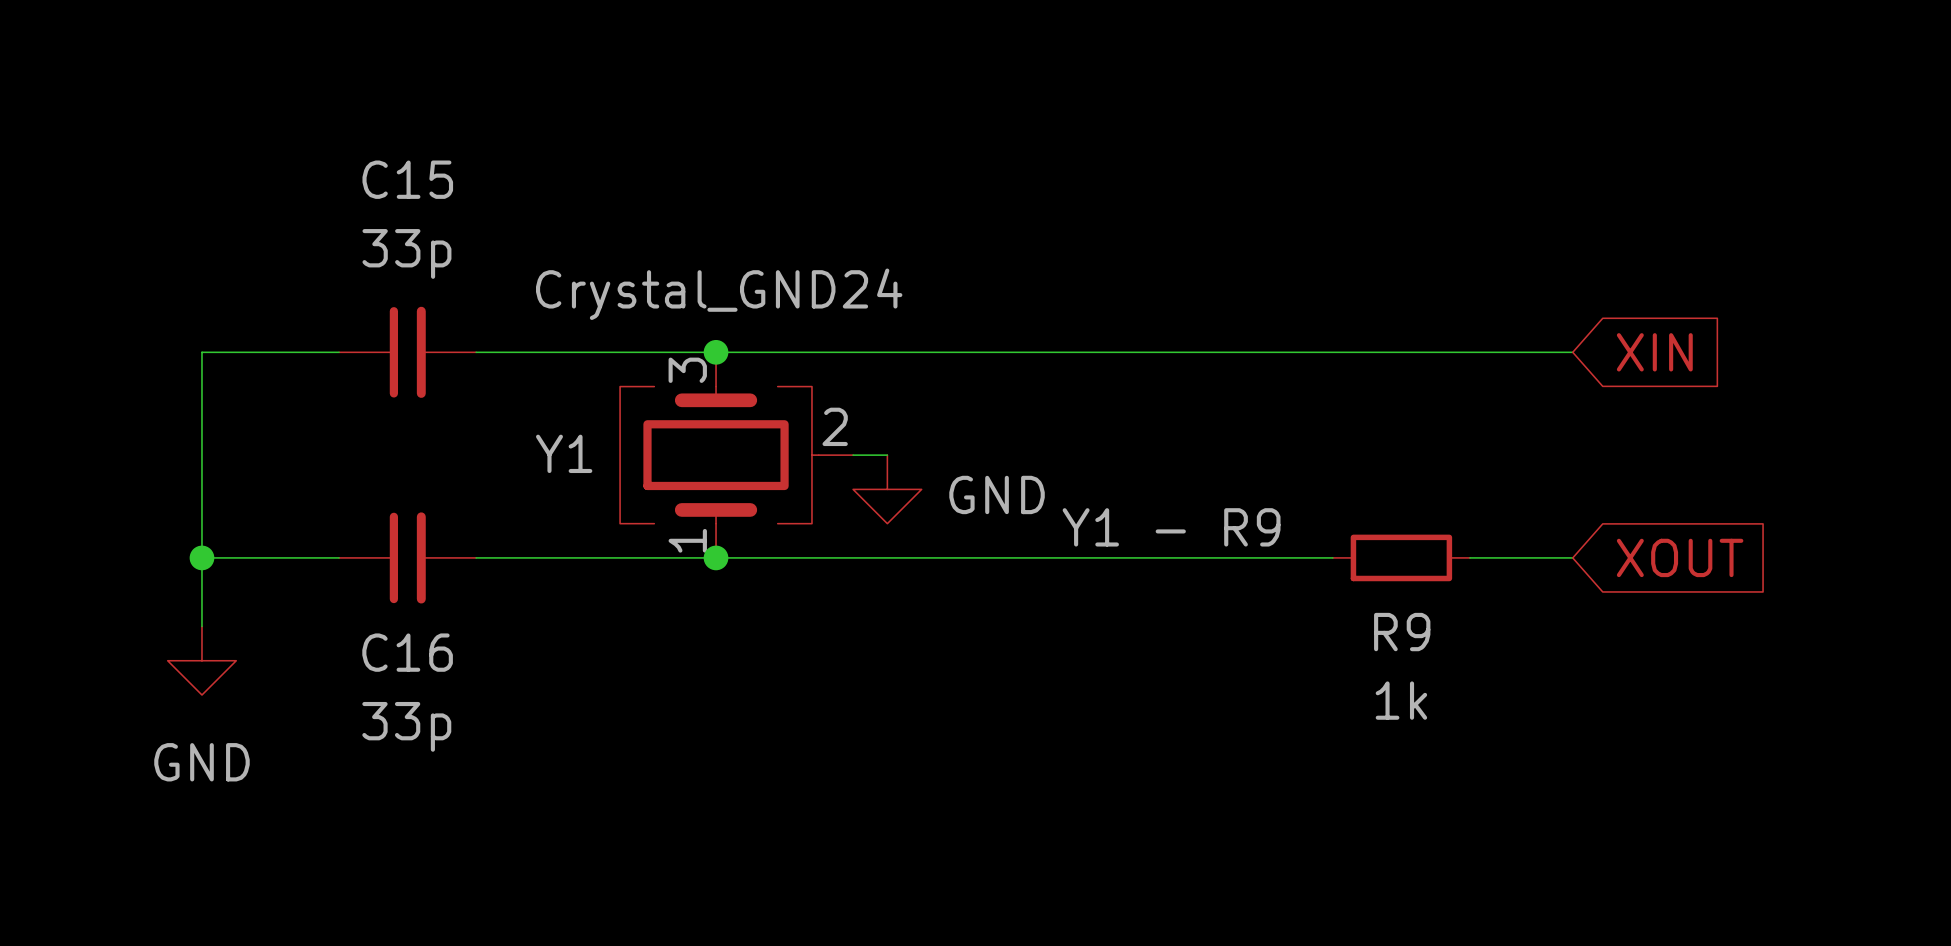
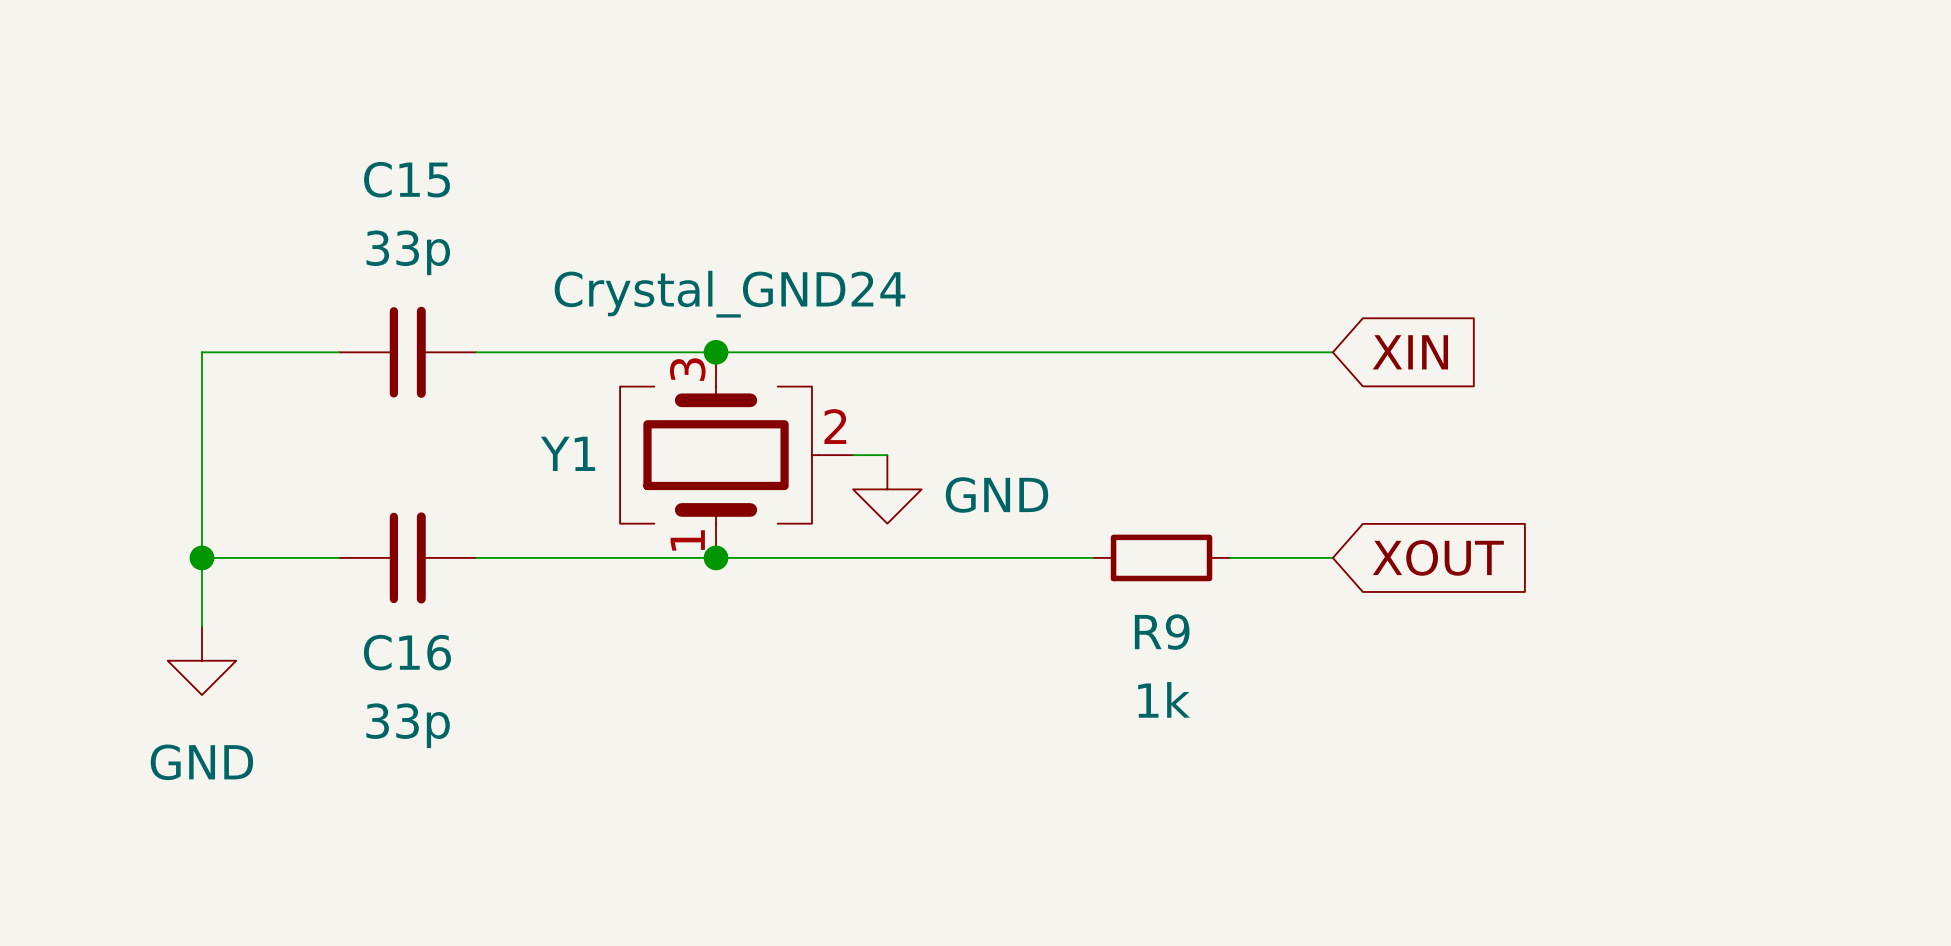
wire: (1332, 352) (1572, 352) -> none
global label position: XIN (1654, 352) -> XIN (1410, 352)
label: Y1 - R9 (1171, 527) -> none
wire: (1092, 557) (1230, 557) -> none
R9 position: (1401, 557) -> (1161, 557)
wire: (1469, 557) (1572, 557) -> none
global label position: XOUT (1680, 557) -> XOUT (1438, 557)

